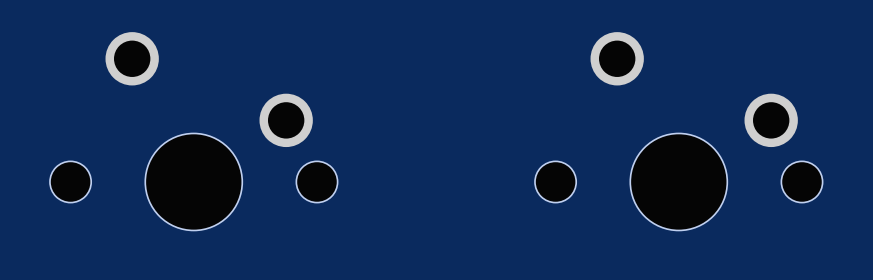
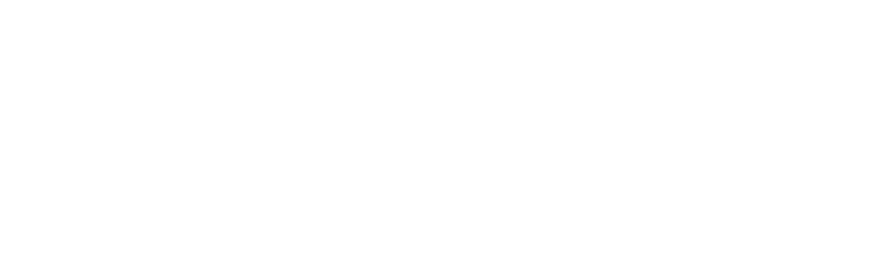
part: (193, 131) -> none
part: (678, 131) -> none

